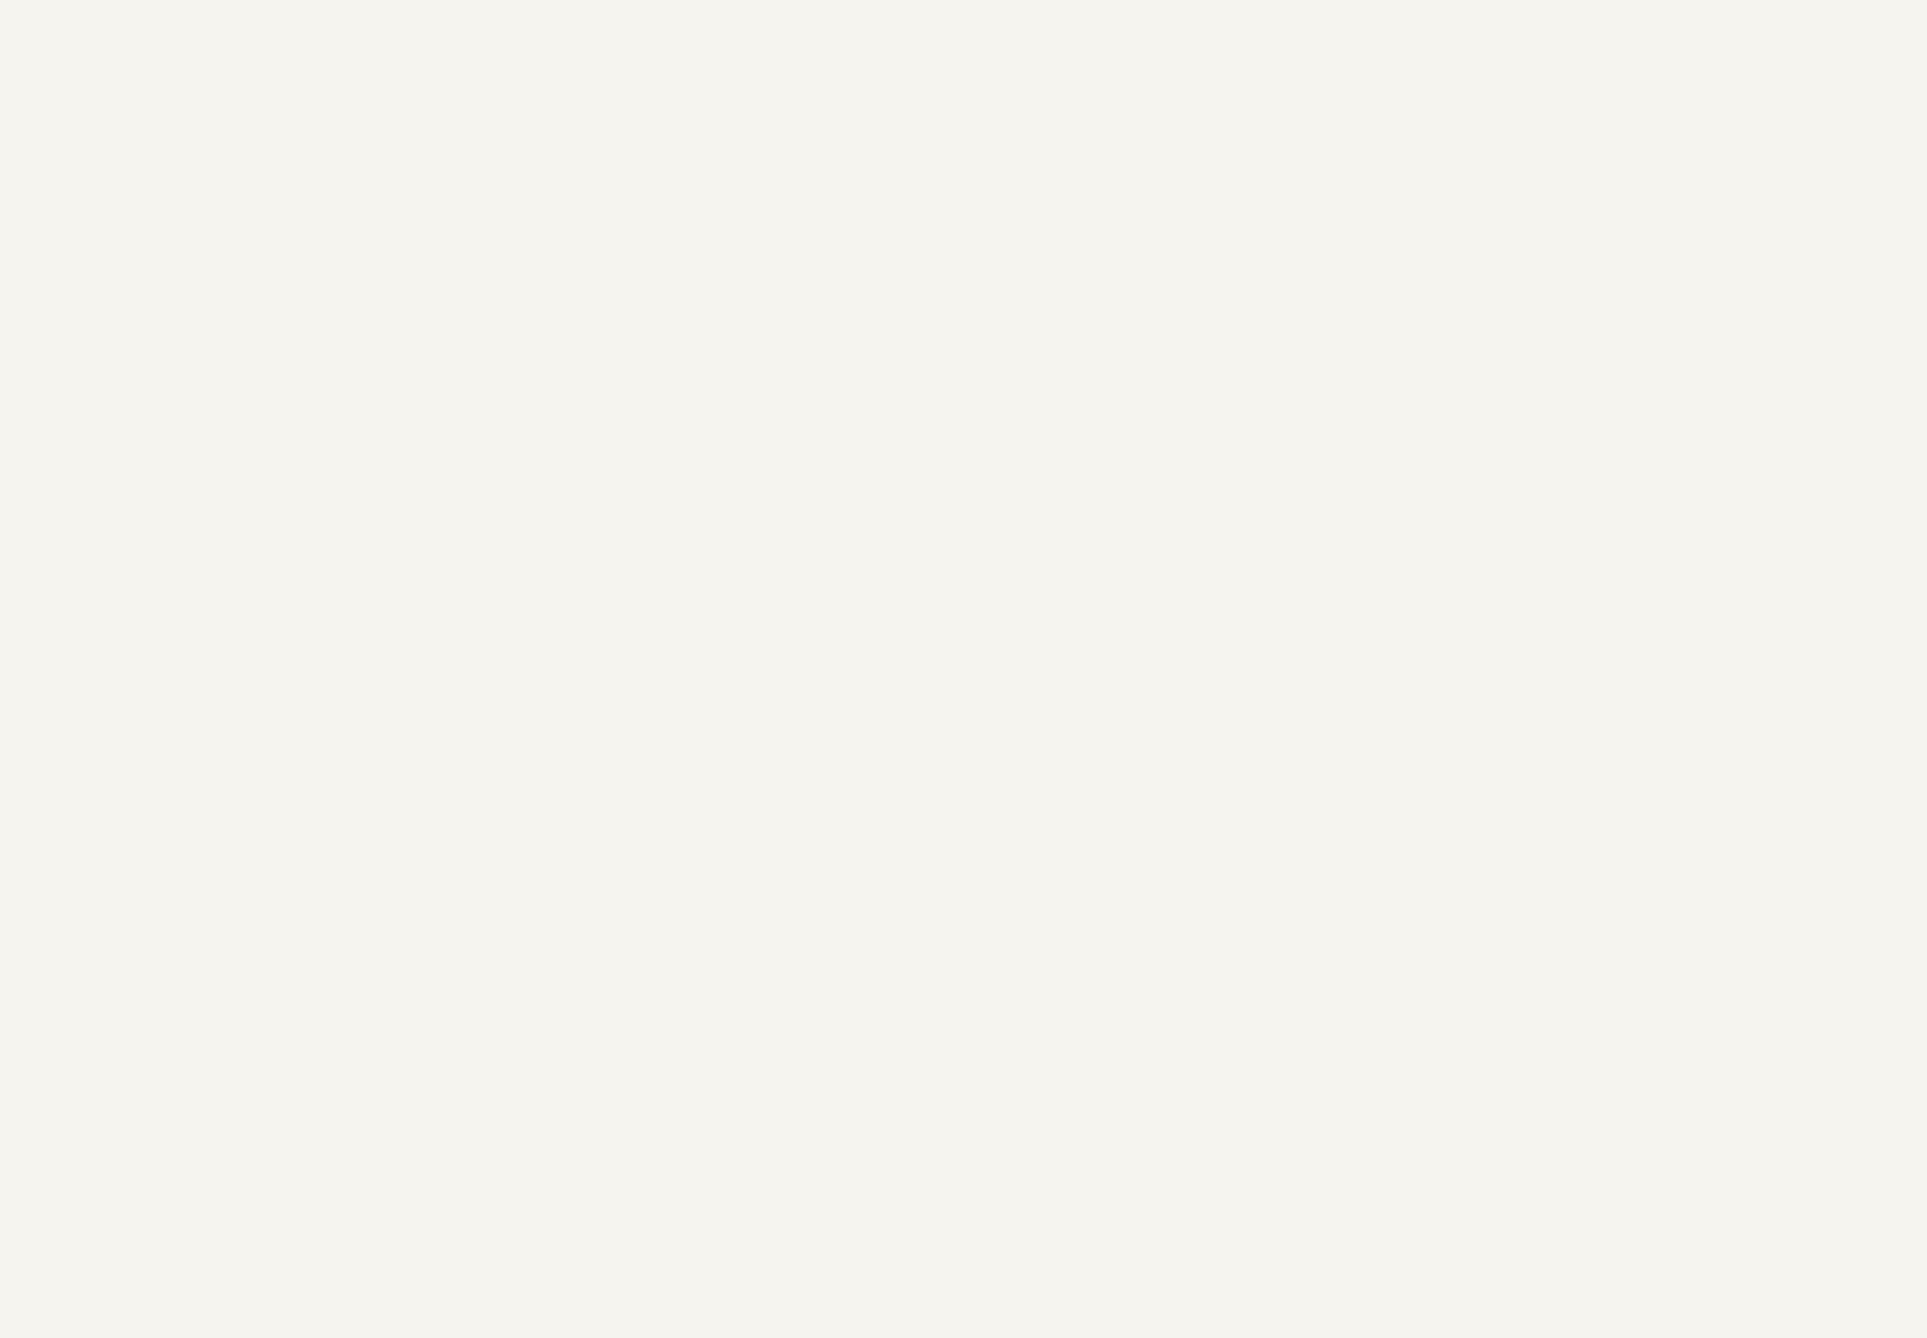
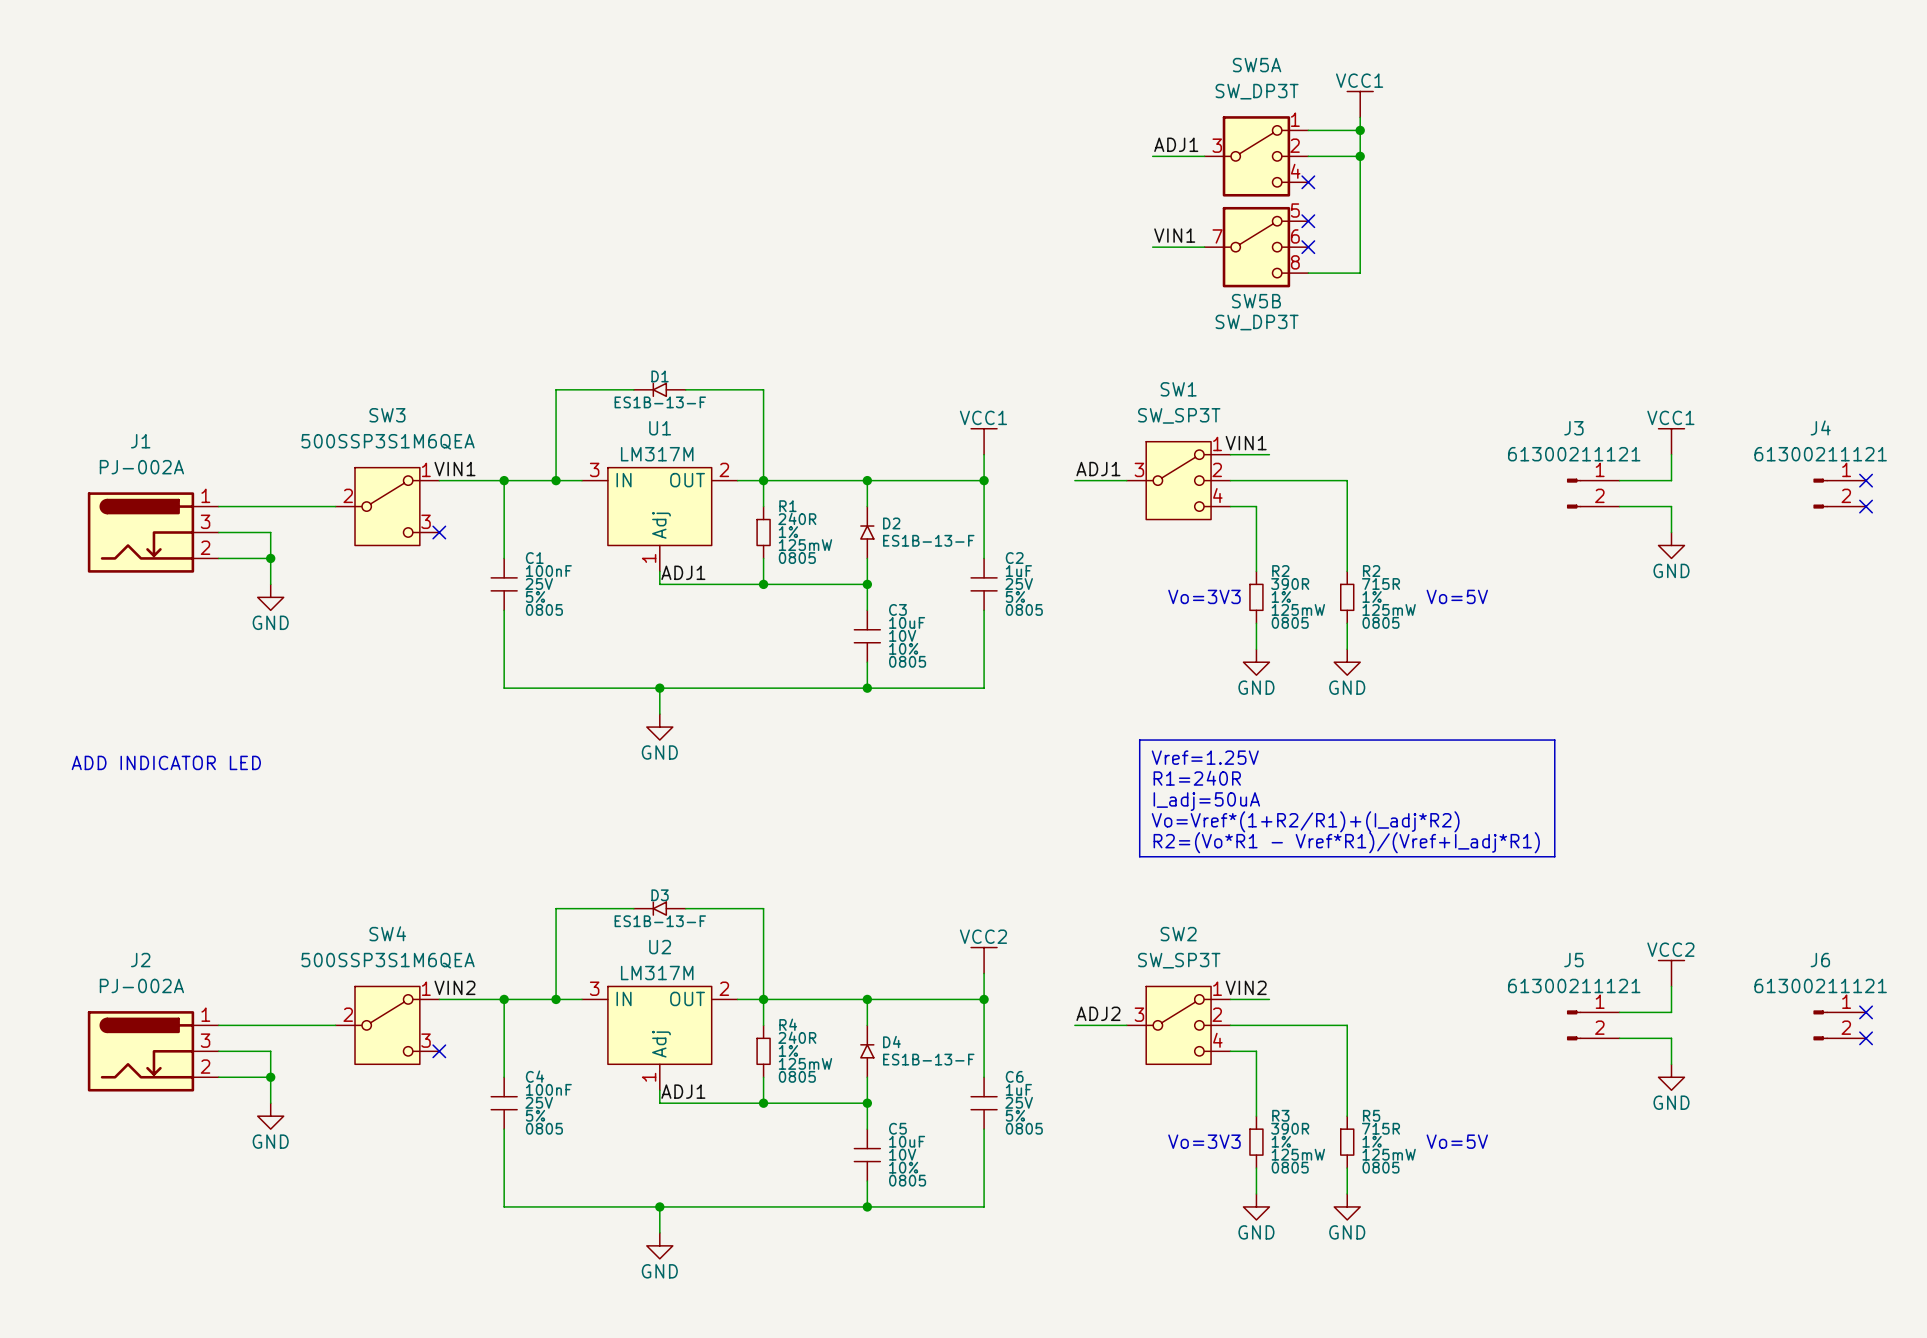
power symbol: none -> VCC1 (1360, 104)
wire: none -> (1360, 117) (1360, 273) (1308, 273)
wire: none -> (1308, 130) (1360, 130)
junction: none -> (1360, 130)
label: none -> ADJ1 (1176, 144)
wire: none -> (1152, 156) (1204, 156)
SW5A: none -> SW_DP3T (1256, 156)
wire: none -> (1308, 156) (1360, 156)
junction: none -> (1360, 156)
no-connect mark: none -> (1308, 182)
no-connect mark: none -> (1308, 221)
label: none -> VIN1 (1174, 235)
wire: none -> (1152, 247) (1204, 247)
SW5B: none -> SW_DP3T (1256, 247)
no-connect mark: none -> (1308, 247)
wire: none -> (633, 389) (556, 389) (556, 480)
D1: none -> ES1B-13-F (659, 389)
wire: none -> (685, 389) (763, 389) (763, 506)
power symbol: none -> VCC1 (984, 441)
power symbol: none -> VCC1 (1671, 441)
label: none -> VIN1 (1246, 443)
wire: none -> (984, 454) (984, 558)
wire: none -> (1230, 454) (1269, 454)
wire: none -> (1671, 454) (1671, 480) (1619, 480)
label: none -> VIN1 (454, 469)
label: none -> ADJ1 (1098, 469)
wire: none -> (439, 480) (581, 480)
wire: none -> (504, 480) (504, 558)
junction: none -> (504, 480)
junction: none -> (556, 480)
wire: none -> (737, 480) (984, 480)
junction: none -> (763, 480)
wire: none -> (867, 480) (867, 506)
junction: none -> (867, 480)
junction: none -> (984, 480)
wire: none -> (1074, 480) (1126, 480)
SW1: none -> SW_SP3T (1178, 480)
wire: none -> (1230, 480) (1347, 480) (1347, 571)
no-connect mark: none -> (1866, 480)
J3: none -> 61300211121 (1593, 493)
J4: none -> 61300211121 (1839, 493)
wire: none -> (218, 506) (335, 506)
SW3: none -> 500SSP3S1M6QEA (387, 506)
wire: none -> (1230, 506) (1256, 506) (1256, 571)
wire: none -> (1619, 506) (1671, 506) (1671, 532)
no-connect mark: none -> (1866, 506)
U1: none -> LM317M (659, 519)
J1: none -> PJ-002A (153, 532)
wire: none -> (218, 532) (270, 532) (270, 584)
no-connect mark: none -> (439, 532)
R1: none -> 240R (763, 532)
D2: none -> ES1B-13-F (867, 532)
power symbol: none -> GND (1671, 545)
wire: none -> (218, 558) (270, 558)
junction: none -> (270, 558)
wire: none -> (763, 558) (763, 584)
wire: none -> (867, 558) (867, 610)
wire: none -> (659, 571) (659, 584) (867, 584)
label: none -> ADJ1 (683, 572)
C1: none -> 100nF (504, 584)
junction: none -> (763, 584)
junction: none -> (867, 584)
C2: none -> 1uF (984, 584)
text: none -> Vo=3V3 (1204, 596)
text: none -> Vo=5V (1457, 596)
power symbol: none -> GND (270, 597)
R2: none -> 390R (1256, 597)
R2: none -> 715R (1347, 597)
wire: none -> (504, 610) (504, 688) (984, 688) (984, 610)
wire: none -> (1256, 623) (1256, 649)
wire: none -> (1347, 623) (1347, 649)
C3: none -> 10uF (867, 636)
wire: none -> (867, 662) (867, 688)
power symbol: none -> GND (1256, 662)
power symbol: none -> GND (1347, 662)
wire: none -> (659, 688) (659, 714)
junction: none -> (659, 688)
junction: none -> (867, 688)
power symbol: none -> GND (659, 727)
line: none -> (1139, 740) (1554, 740) (1554, 856) (1139, 856) (1139, 740)
text: none -> Vref=1.25V (1205, 757)
text: none -> ADD INDICATOR LED (166, 762)
text: none -> R1=240R (1197, 778)
text: none -> I_adj=50uA (1206, 801)
text: none -> Vo=Vref*(1+R2/R1)+(I_adj*R2) (1305, 821)
text: none -> R2=(Vo*R1 - Vref*R1)/(Vref+I_adj*R1) (1346, 842)
wire: none -> (633, 908) (556, 908) (556, 999)
D3: none -> ES1B-13-F (659, 908)
wire: none -> (685, 908) (763, 908) (763, 1025)
power symbol: none -> VCC2 (984, 960)
wire: none -> (984, 973) (984, 1077)
power symbol: none -> VCC2 (1671, 973)
wire: none -> (1671, 986) (1671, 1012) (1619, 1012)
label: none -> VIN2 (454, 987)
label: none -> VIN2 (1246, 987)
wire: none -> (439, 999) (581, 999)
wire: none -> (504, 999) (504, 1077)
junction: none -> (504, 999)
junction: none -> (556, 999)
wire: none -> (737, 999) (984, 999)
junction: none -> (763, 999)
wire: none -> (867, 999) (867, 1025)
junction: none -> (867, 999)
junction: none -> (984, 999)
wire: none -> (1230, 999) (1269, 999)
no-connect mark: none -> (1866, 1012)
label: none -> ADJ2 (1098, 1013)
wire: none -> (218, 1025) (335, 1025)
SW4: none -> 500SSP3S1M6QEA (387, 1025)
wire: none -> (1074, 1025) (1126, 1025)
SW2: none -> SW_SP3T (1178, 1025)
wire: none -> (1230, 1025) (1347, 1025) (1347, 1116)
J5: none -> 61300211121 (1593, 1025)
J6: none -> 61300211121 (1839, 1025)
U2: none -> LM317M (659, 1038)
wire: none -> (1619, 1038) (1671, 1038) (1671, 1064)
no-connect mark: none -> (1866, 1038)
J2: none -> PJ-002A (153, 1051)
wire: none -> (218, 1051) (270, 1051) (270, 1103)
no-connect mark: none -> (439, 1051)
R4: none -> 240R (763, 1051)
D4: none -> ES1B-13-F (867, 1051)
wire: none -> (1230, 1051) (1256, 1051) (1256, 1116)
wire: none -> (218, 1077) (270, 1077)
junction: none -> (270, 1077)
wire: none -> (763, 1077) (763, 1103)
wire: none -> (867, 1077) (867, 1129)
power symbol: none -> GND (1671, 1077)
wire: none -> (659, 1090) (659, 1103) (867, 1103)
label: none -> ADJ1 (683, 1091)
C4: none -> 100nF (504, 1103)
junction: none -> (763, 1103)
junction: none -> (867, 1103)
C6: none -> 1uF (984, 1103)
power symbol: none -> GND (270, 1116)
wire: none -> (504, 1129) (504, 1206) (984, 1206) (984, 1129)
text: none -> Vo=3V3 (1204, 1141)
text: none -> Vo=5V (1457, 1141)
R3: none -> 390R (1256, 1142)
R5: none -> 715R (1347, 1142)
C5: none -> 10uF (867, 1155)
wire: none -> (1256, 1168) (1256, 1193)
wire: none -> (1347, 1168) (1347, 1193)
wire: none -> (867, 1181) (867, 1206)
wire: none -> (659, 1206) (659, 1232)
junction: none -> (659, 1206)
junction: none -> (867, 1206)
power symbol: none -> GND (1256, 1206)
power symbol: none -> GND (1347, 1206)
power symbol: none -> GND (659, 1245)

